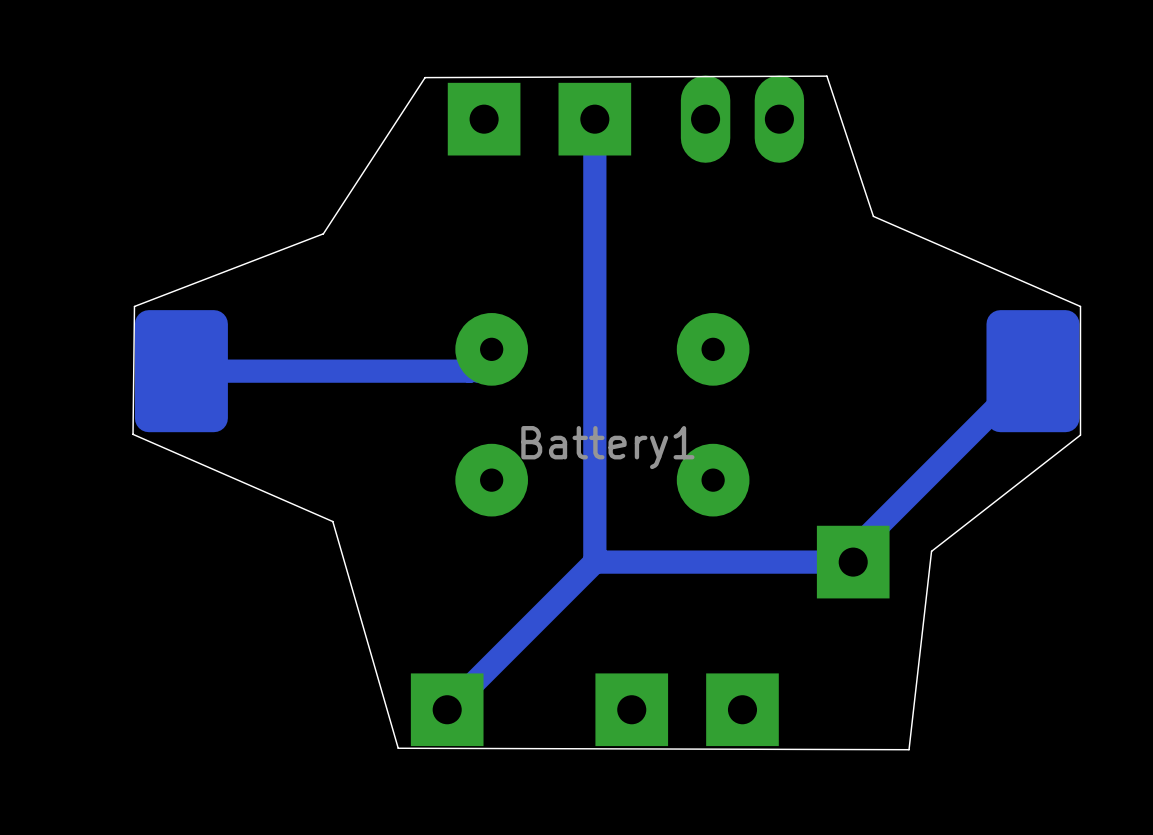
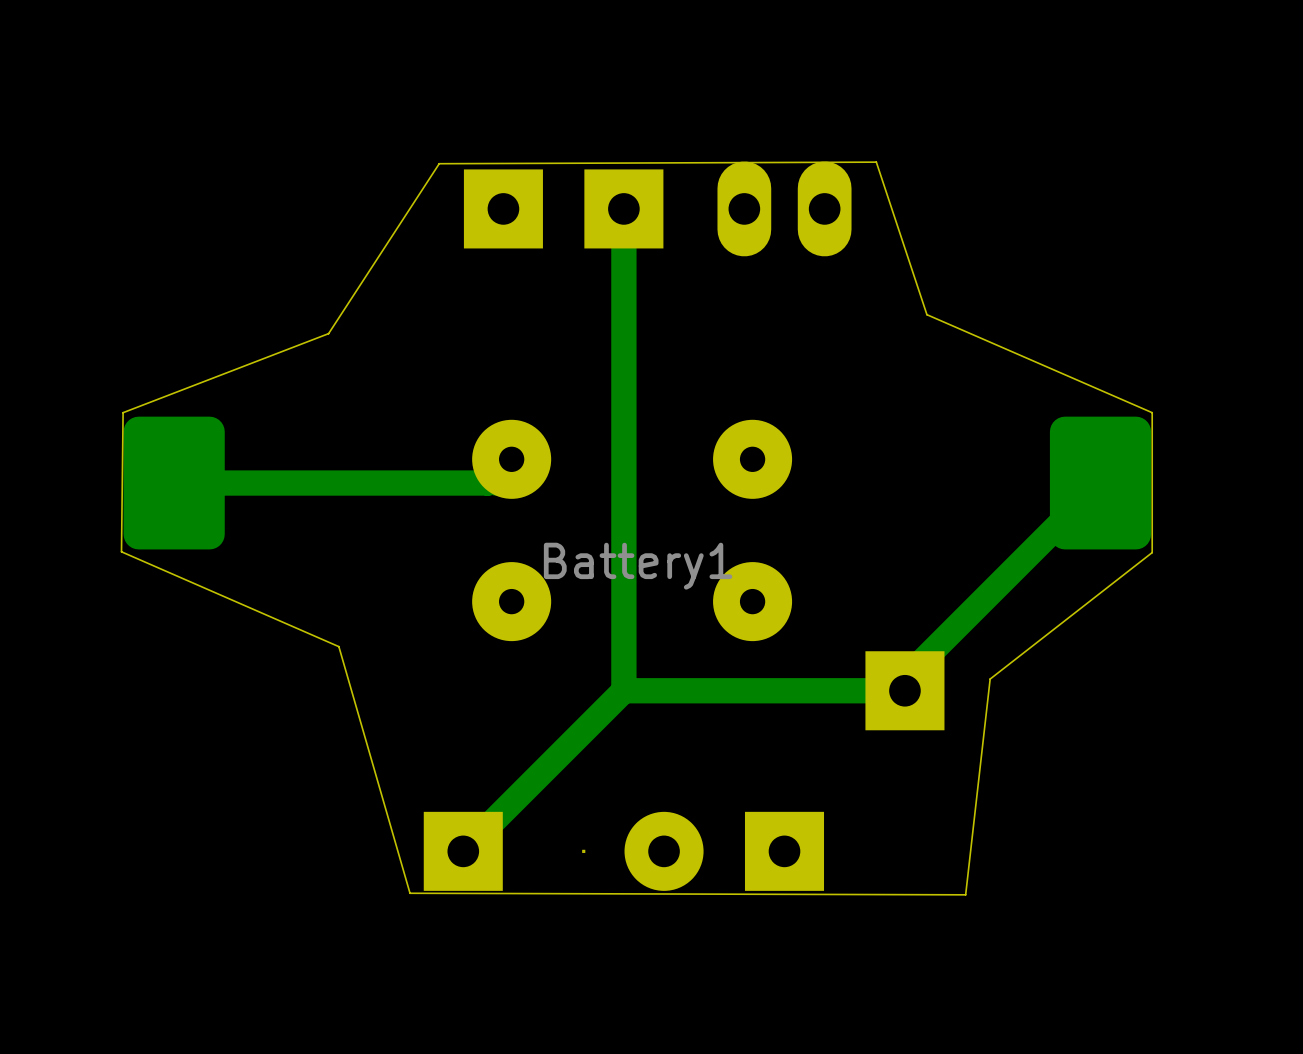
part footprint: [595, 673, 669, 747] -> [582, 811, 704, 891]

